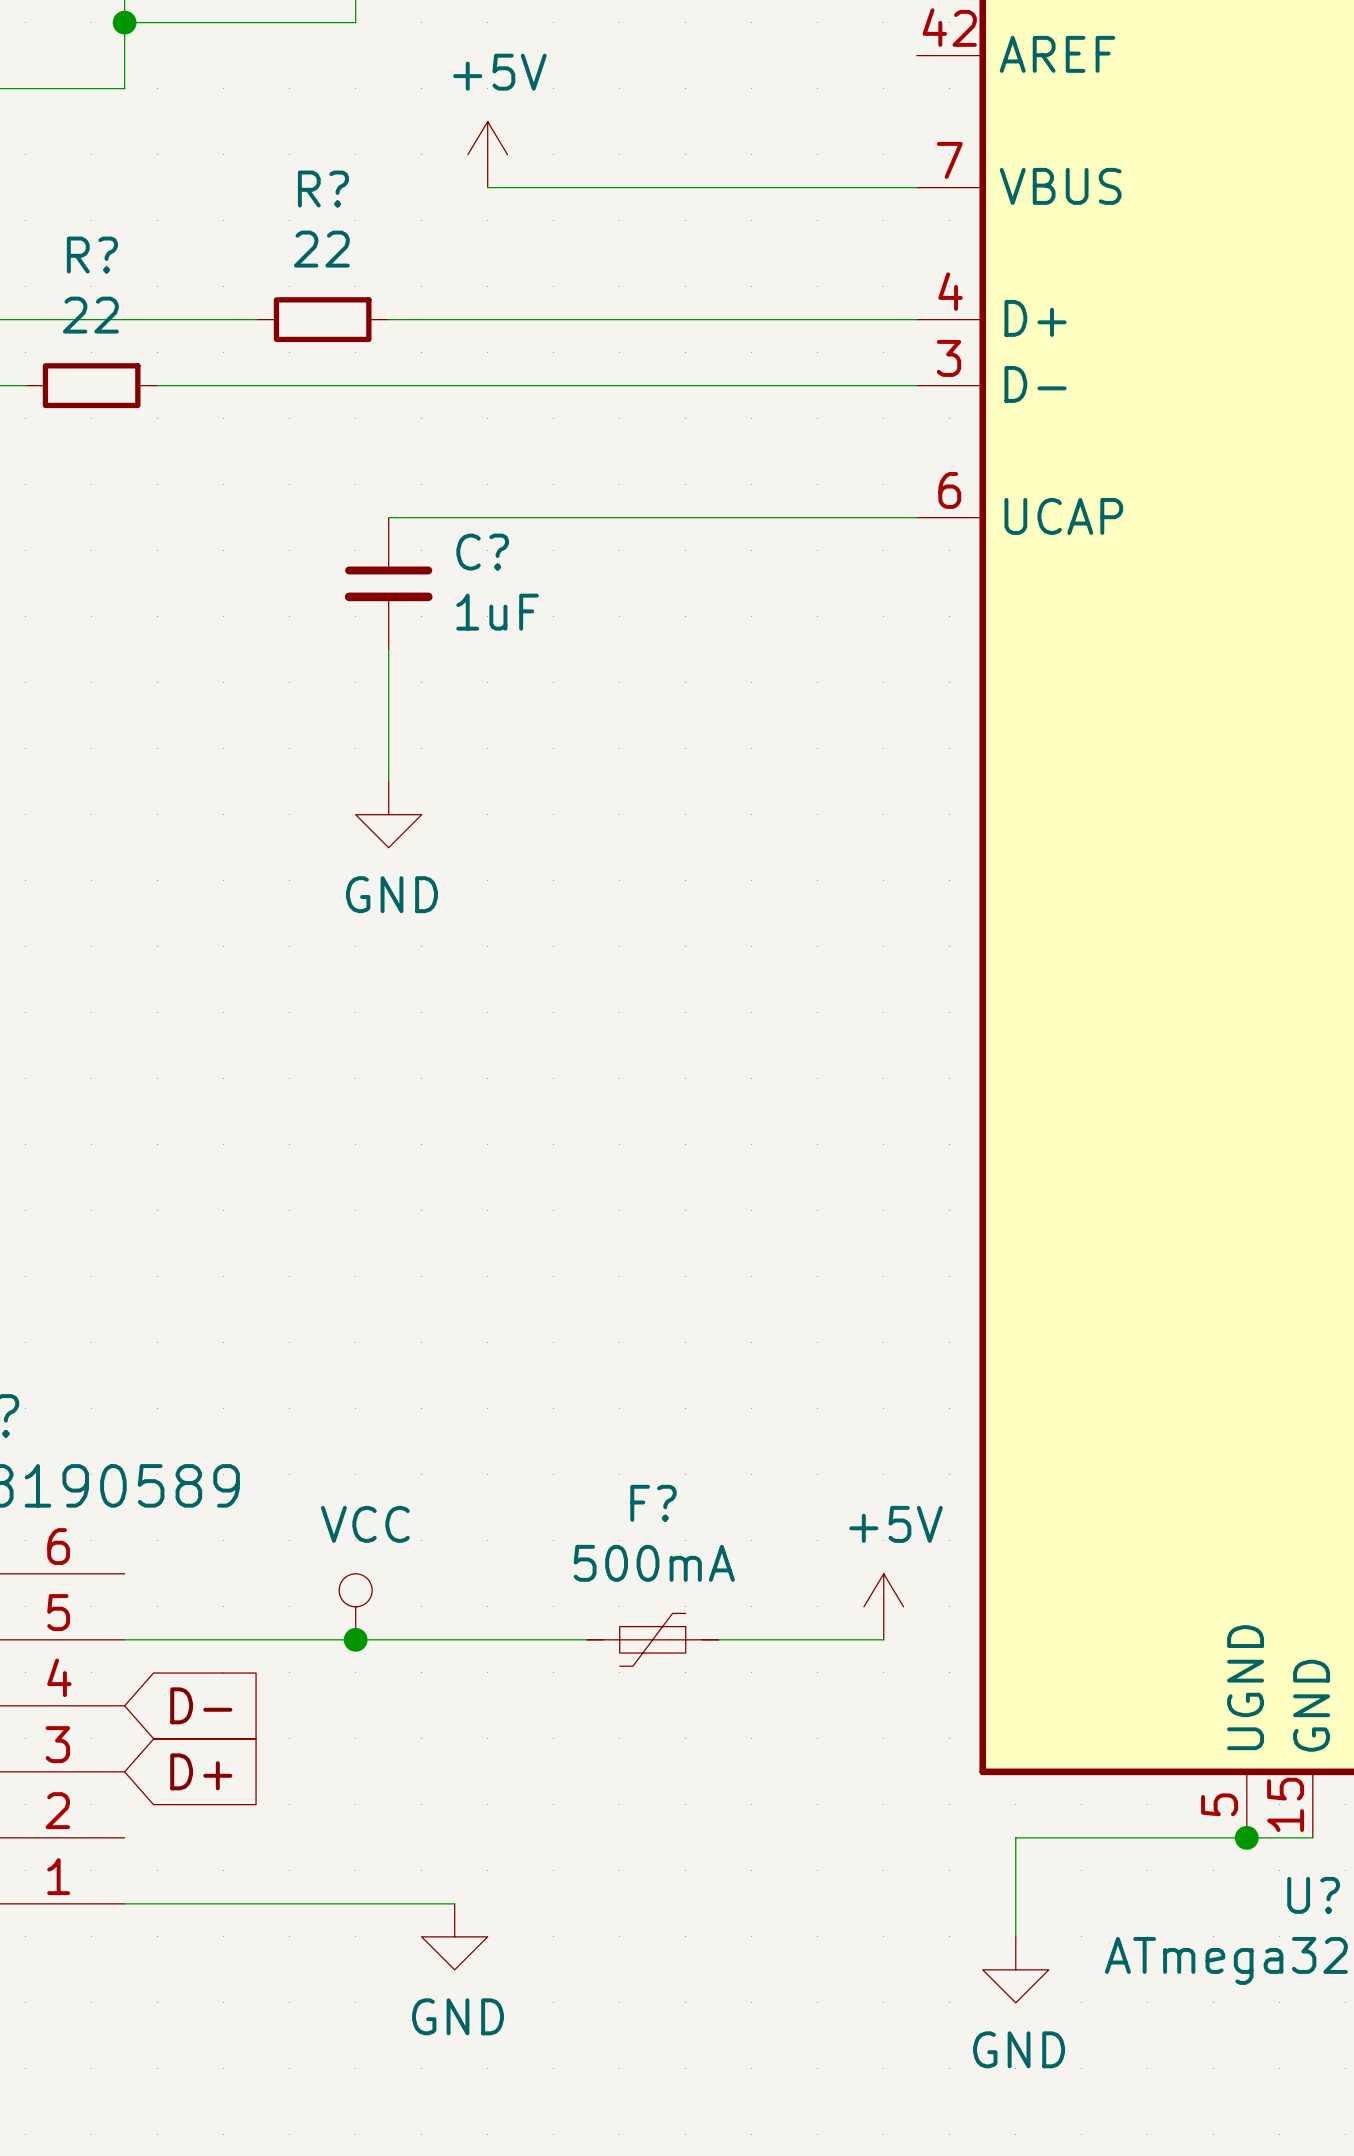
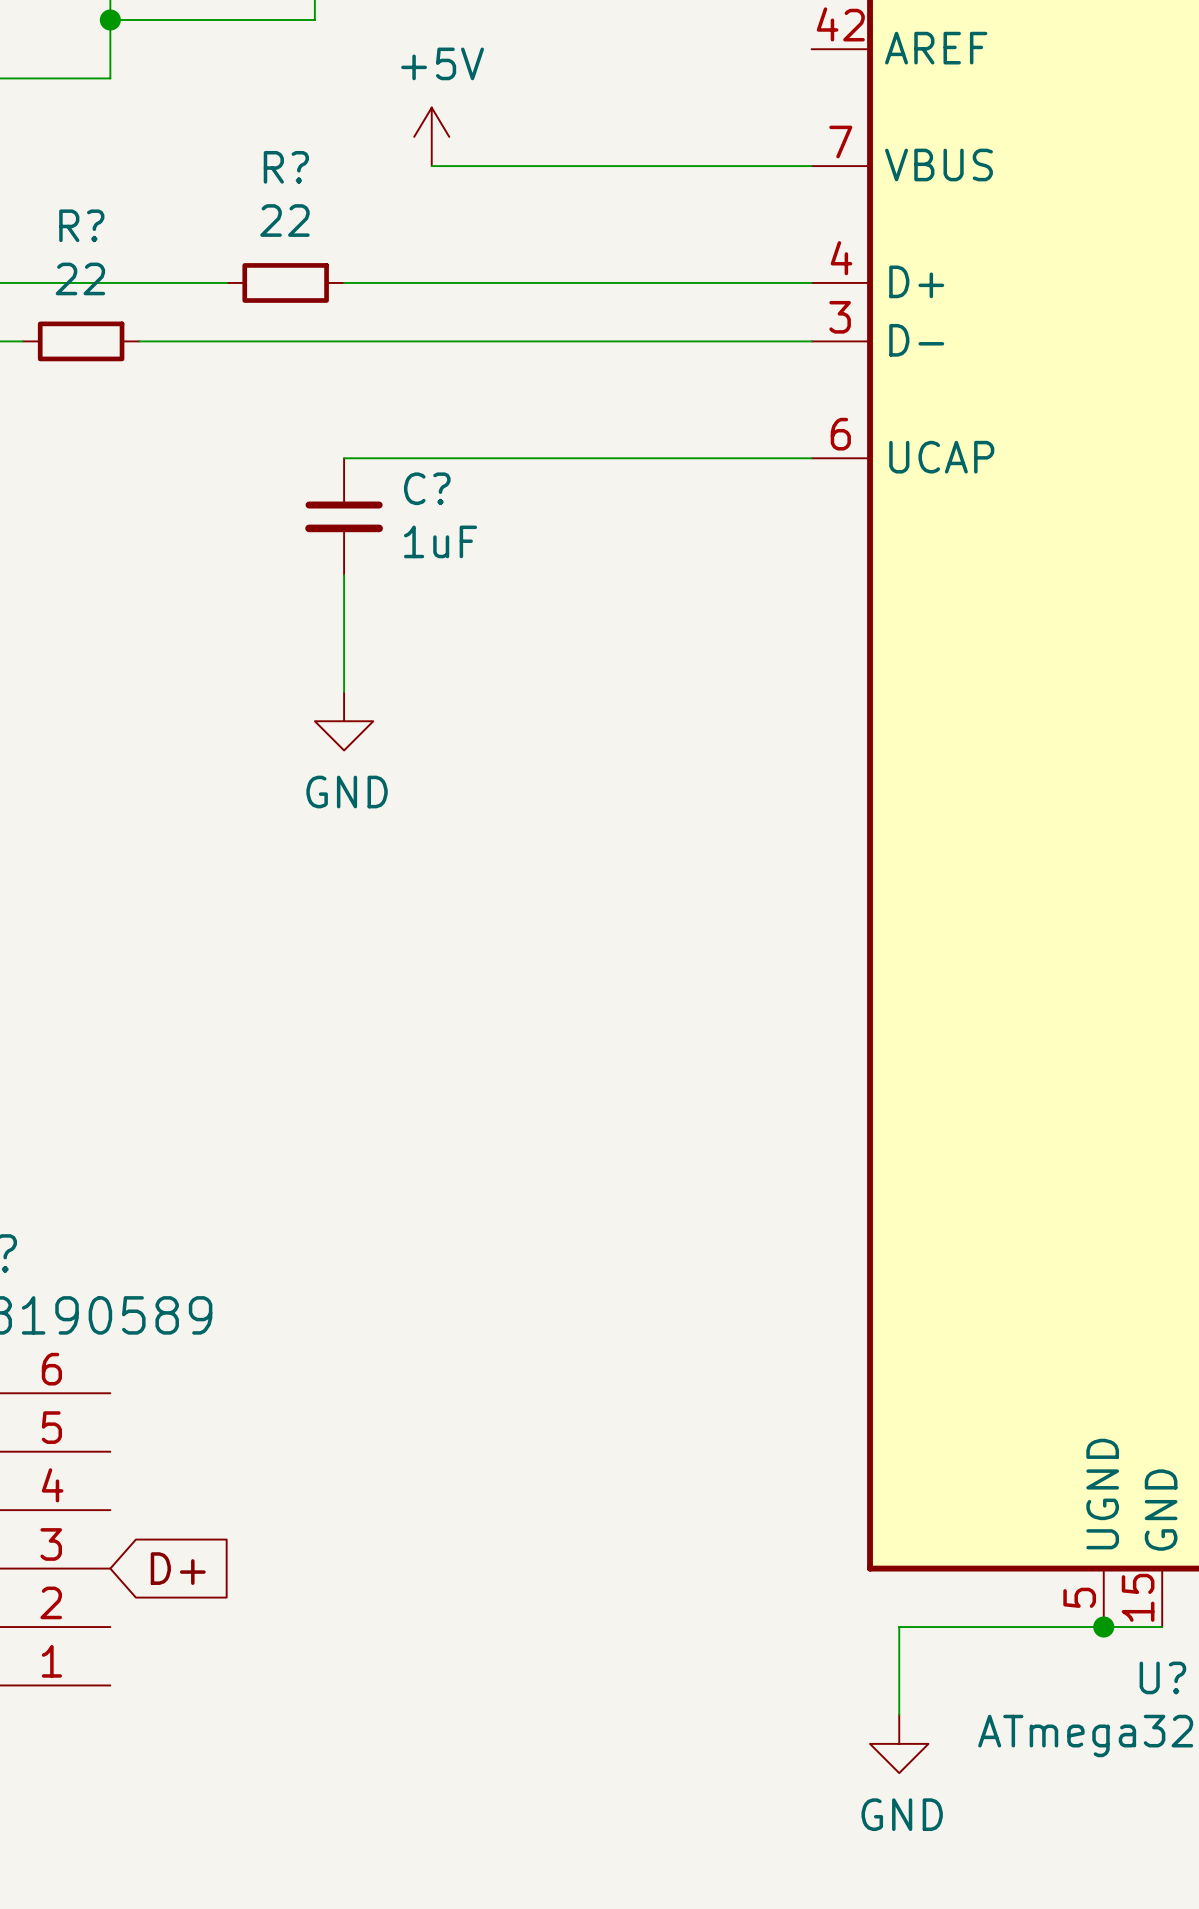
power symbol: VCC (355, 1606) -> none
power symbol: +5V (883, 1606) -> none
wire: (124, 1639) (586, 1639) -> none
junction: (355, 1639) -> none
F?: 500mA (652, 1639) -> none
wire: (718, 1639) (883, 1639) -> none
global label: D- (201, 1705) -> none
wire: (124, 1903) (454, 1903) -> none
power symbol: GND (454, 1936) -> none

